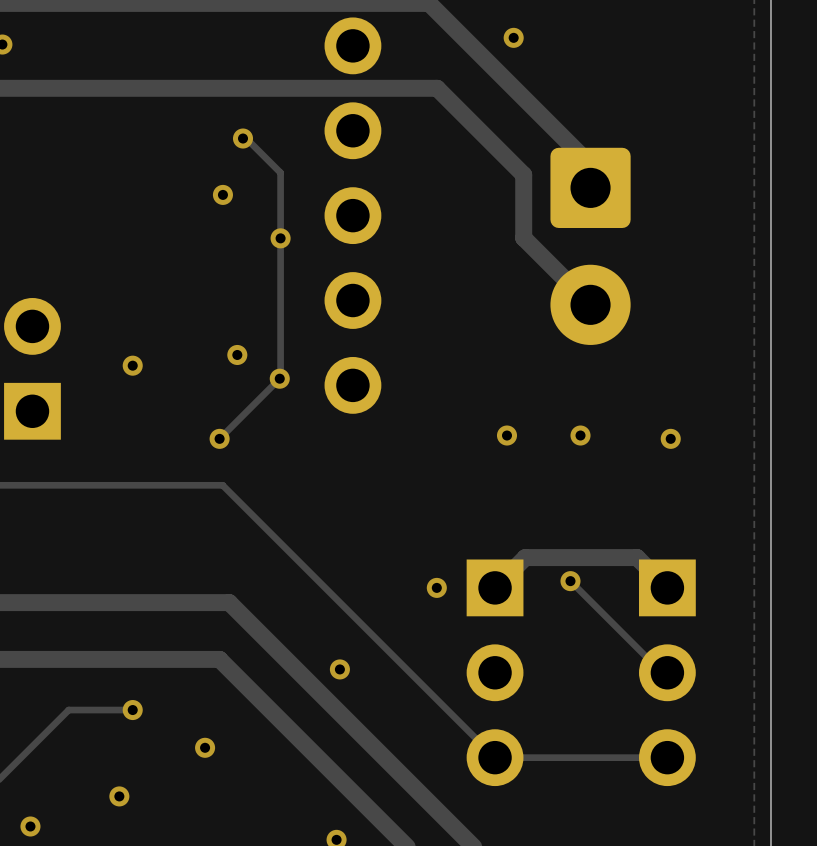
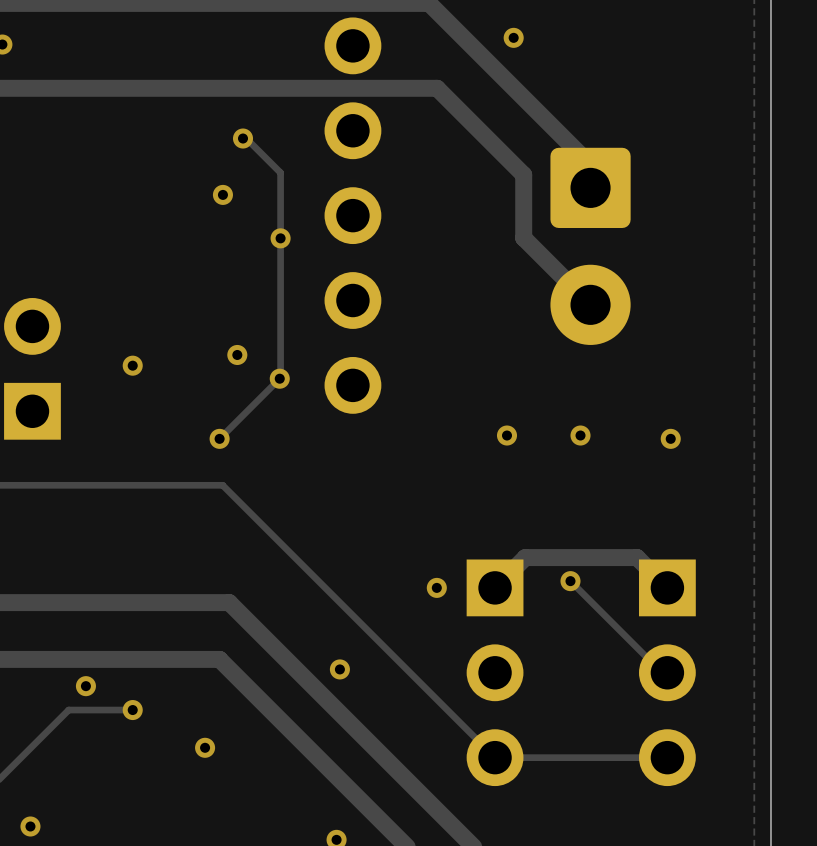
via: none -> (85, 686)
via: (119, 796) -> none

